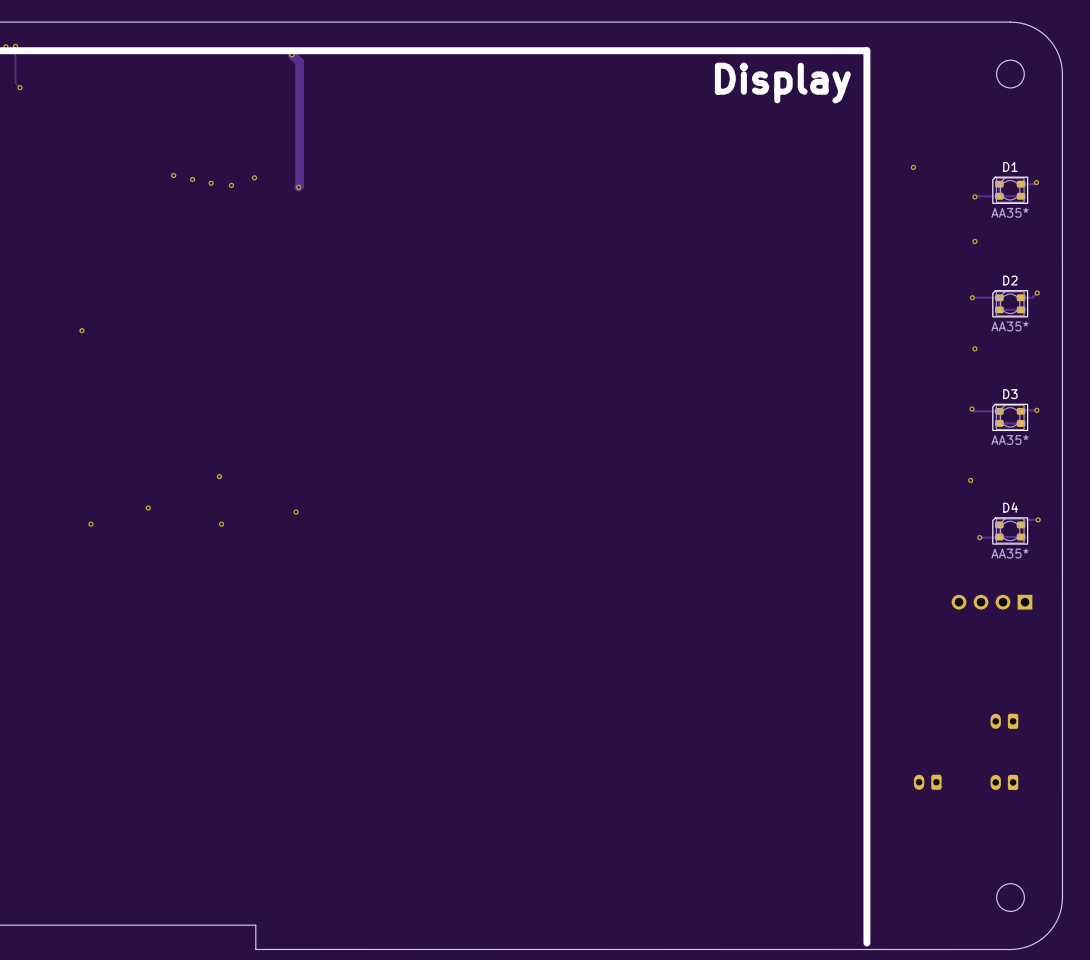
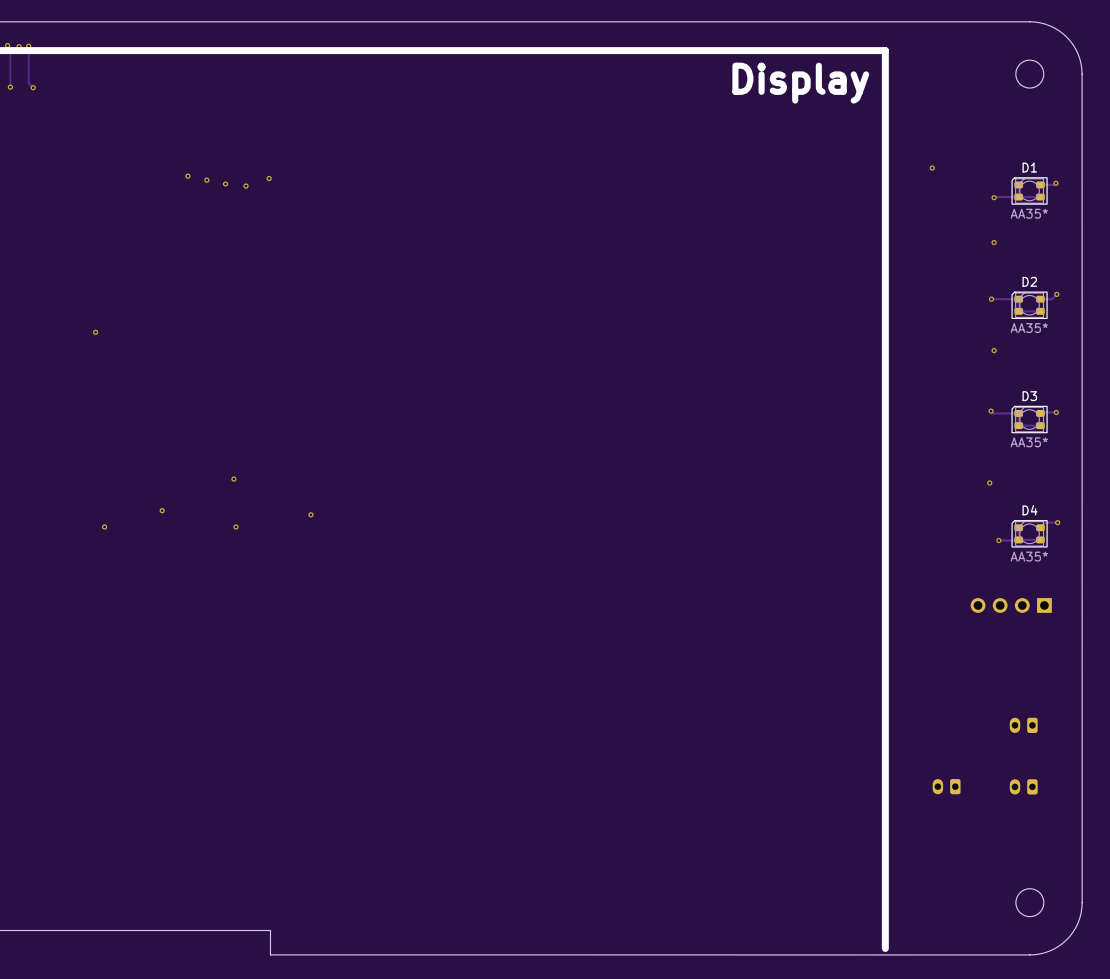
track: (291, 54) (299, 62) (298, 187) -> none
via: (291, 54) -> none
via: (298, 187) -> none

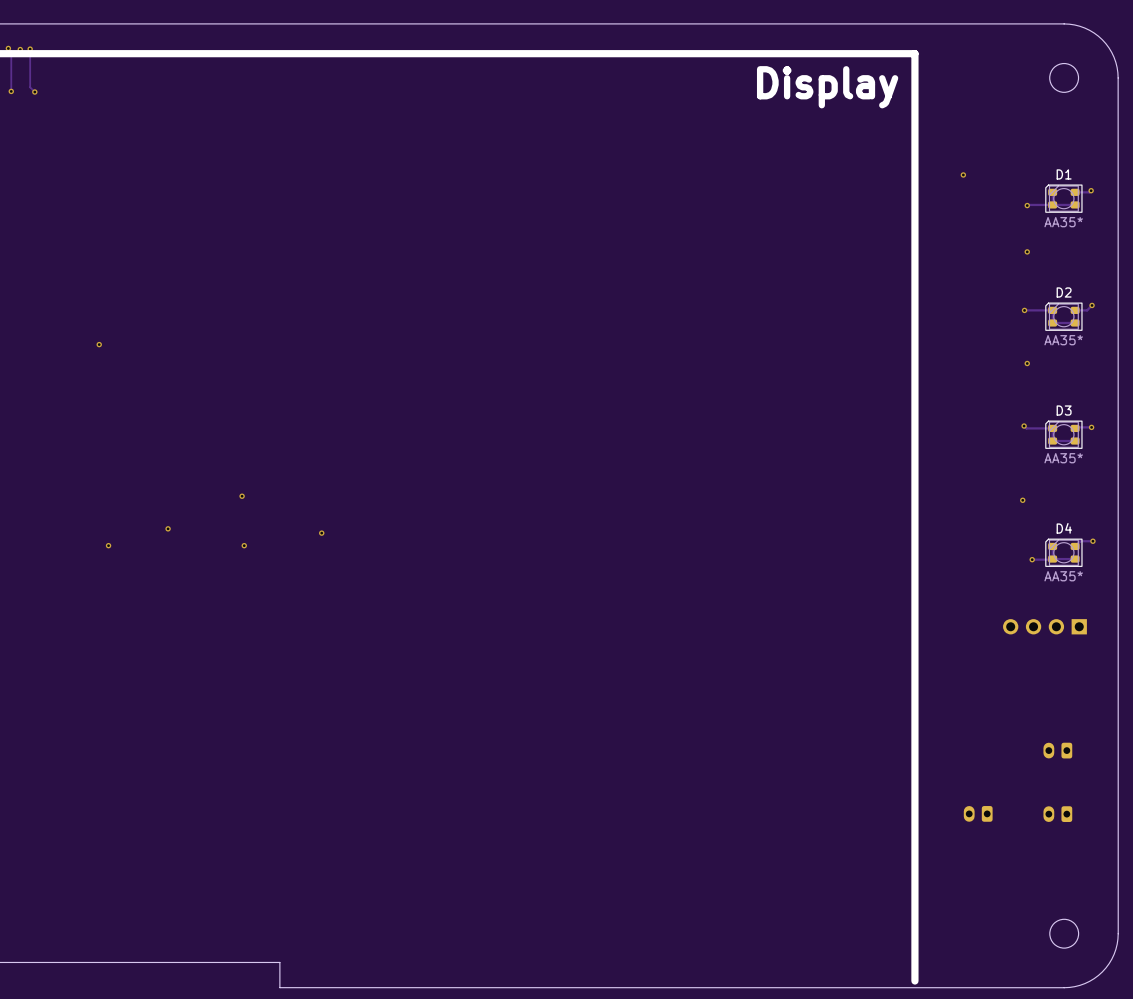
via: (187, 176) -> none
via: (269, 178) -> none
via: (206, 180) -> none
via: (225, 183) -> none
via: (246, 186) -> none

